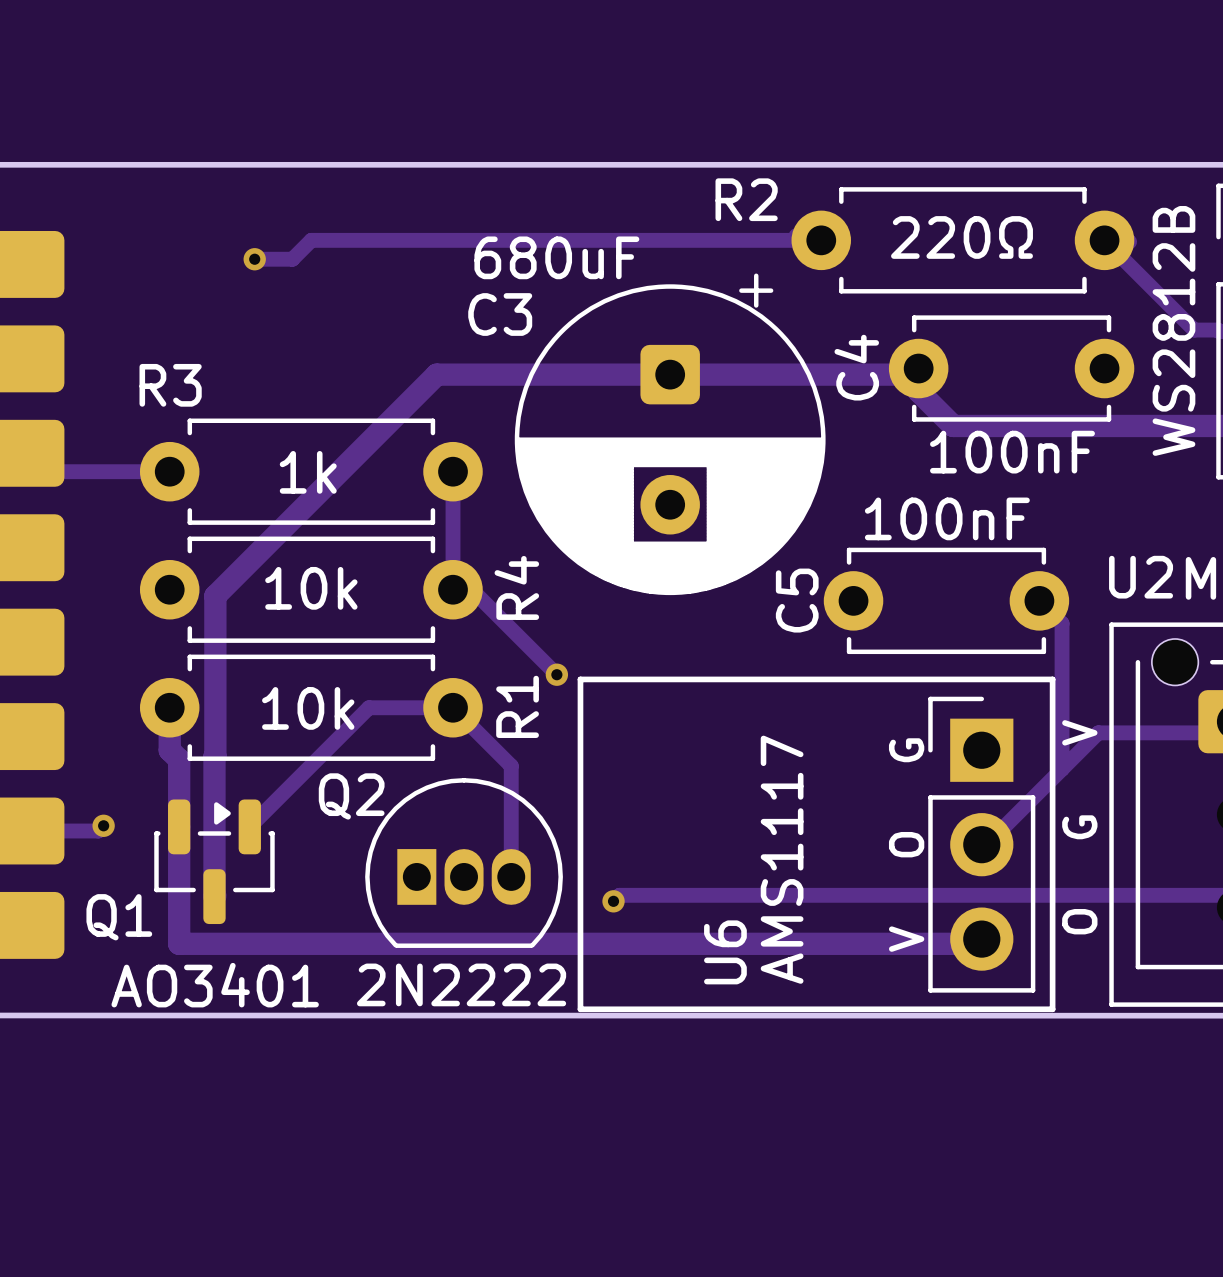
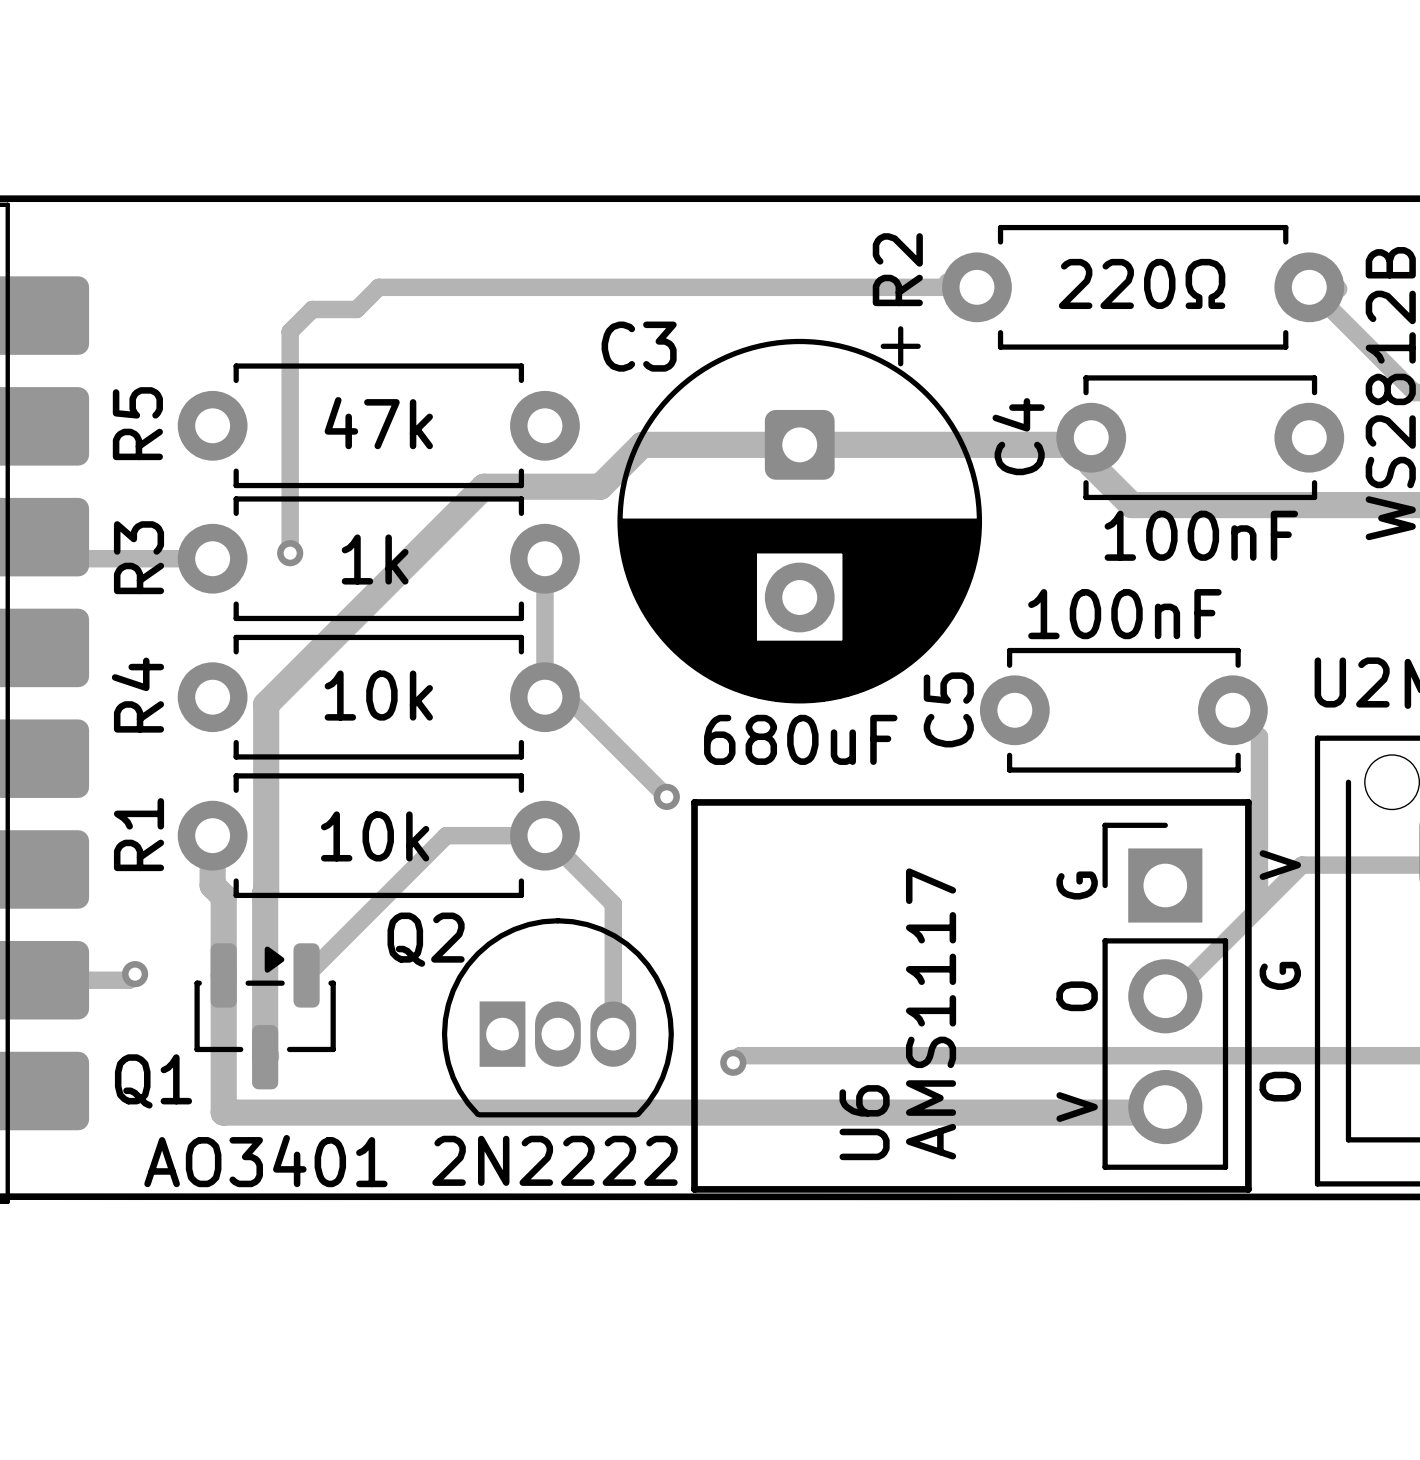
R2 name rotation: 0° (746, 199) -> 90° counterclockwise (897, 269)
C3 value position: 680uF (556, 257) -> 680uF (800, 739)
track: none -> (312, 309) (290, 331) (290, 553)
via position: (254, 259) -> (290, 553)
C3 name position: C3 (500, 314) -> C3 (639, 346)
R5: none -> 47k (378, 425)
track: (535, 374) (436, 374) (401, 410) -> (642, 444) (600, 486) (484, 486)
R3 name rotation: 0° (170, 385) -> 90° counterclockwise (139, 557)
R3 name position: R3 (170, 385) -> R3 (139, 557)
R4 name position: R4 (516, 587) -> R4 (137, 695)
R1 name position: R1 (517, 706) -> R1 (139, 834)

